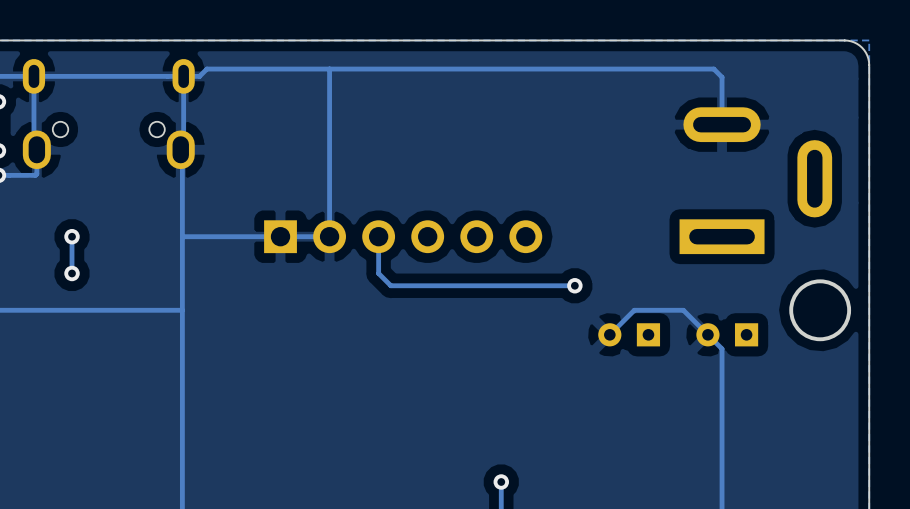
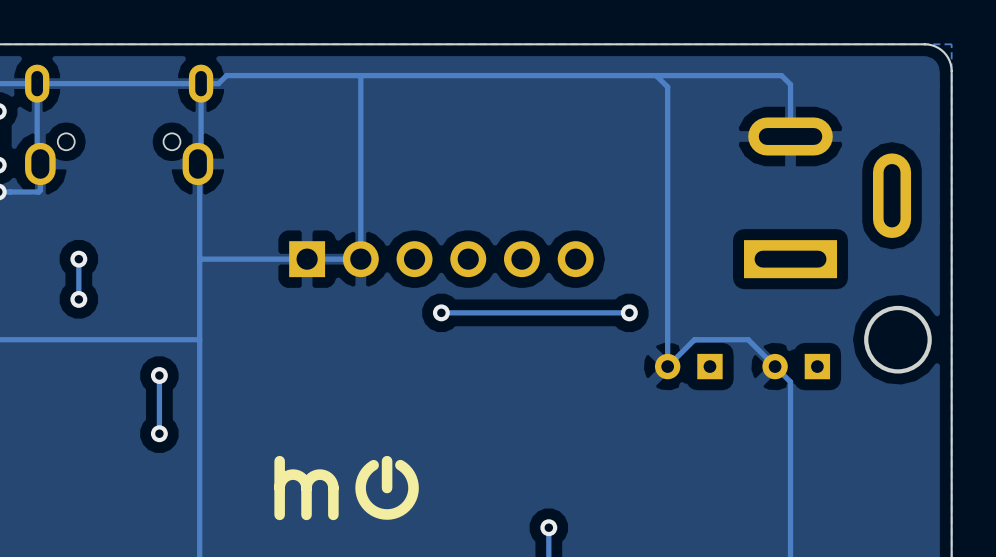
track: none -> (656, 75) (667, 87) (667, 366)
track: (378, 236) (378, 273) (390, 285) (403, 285) -> none
via: none -> (441, 312)
track: none -> (159, 375) (159, 433)
via: none -> (159, 375)
via: none -> (159, 433)
drawing: none -> [274, 455, 419, 521]

